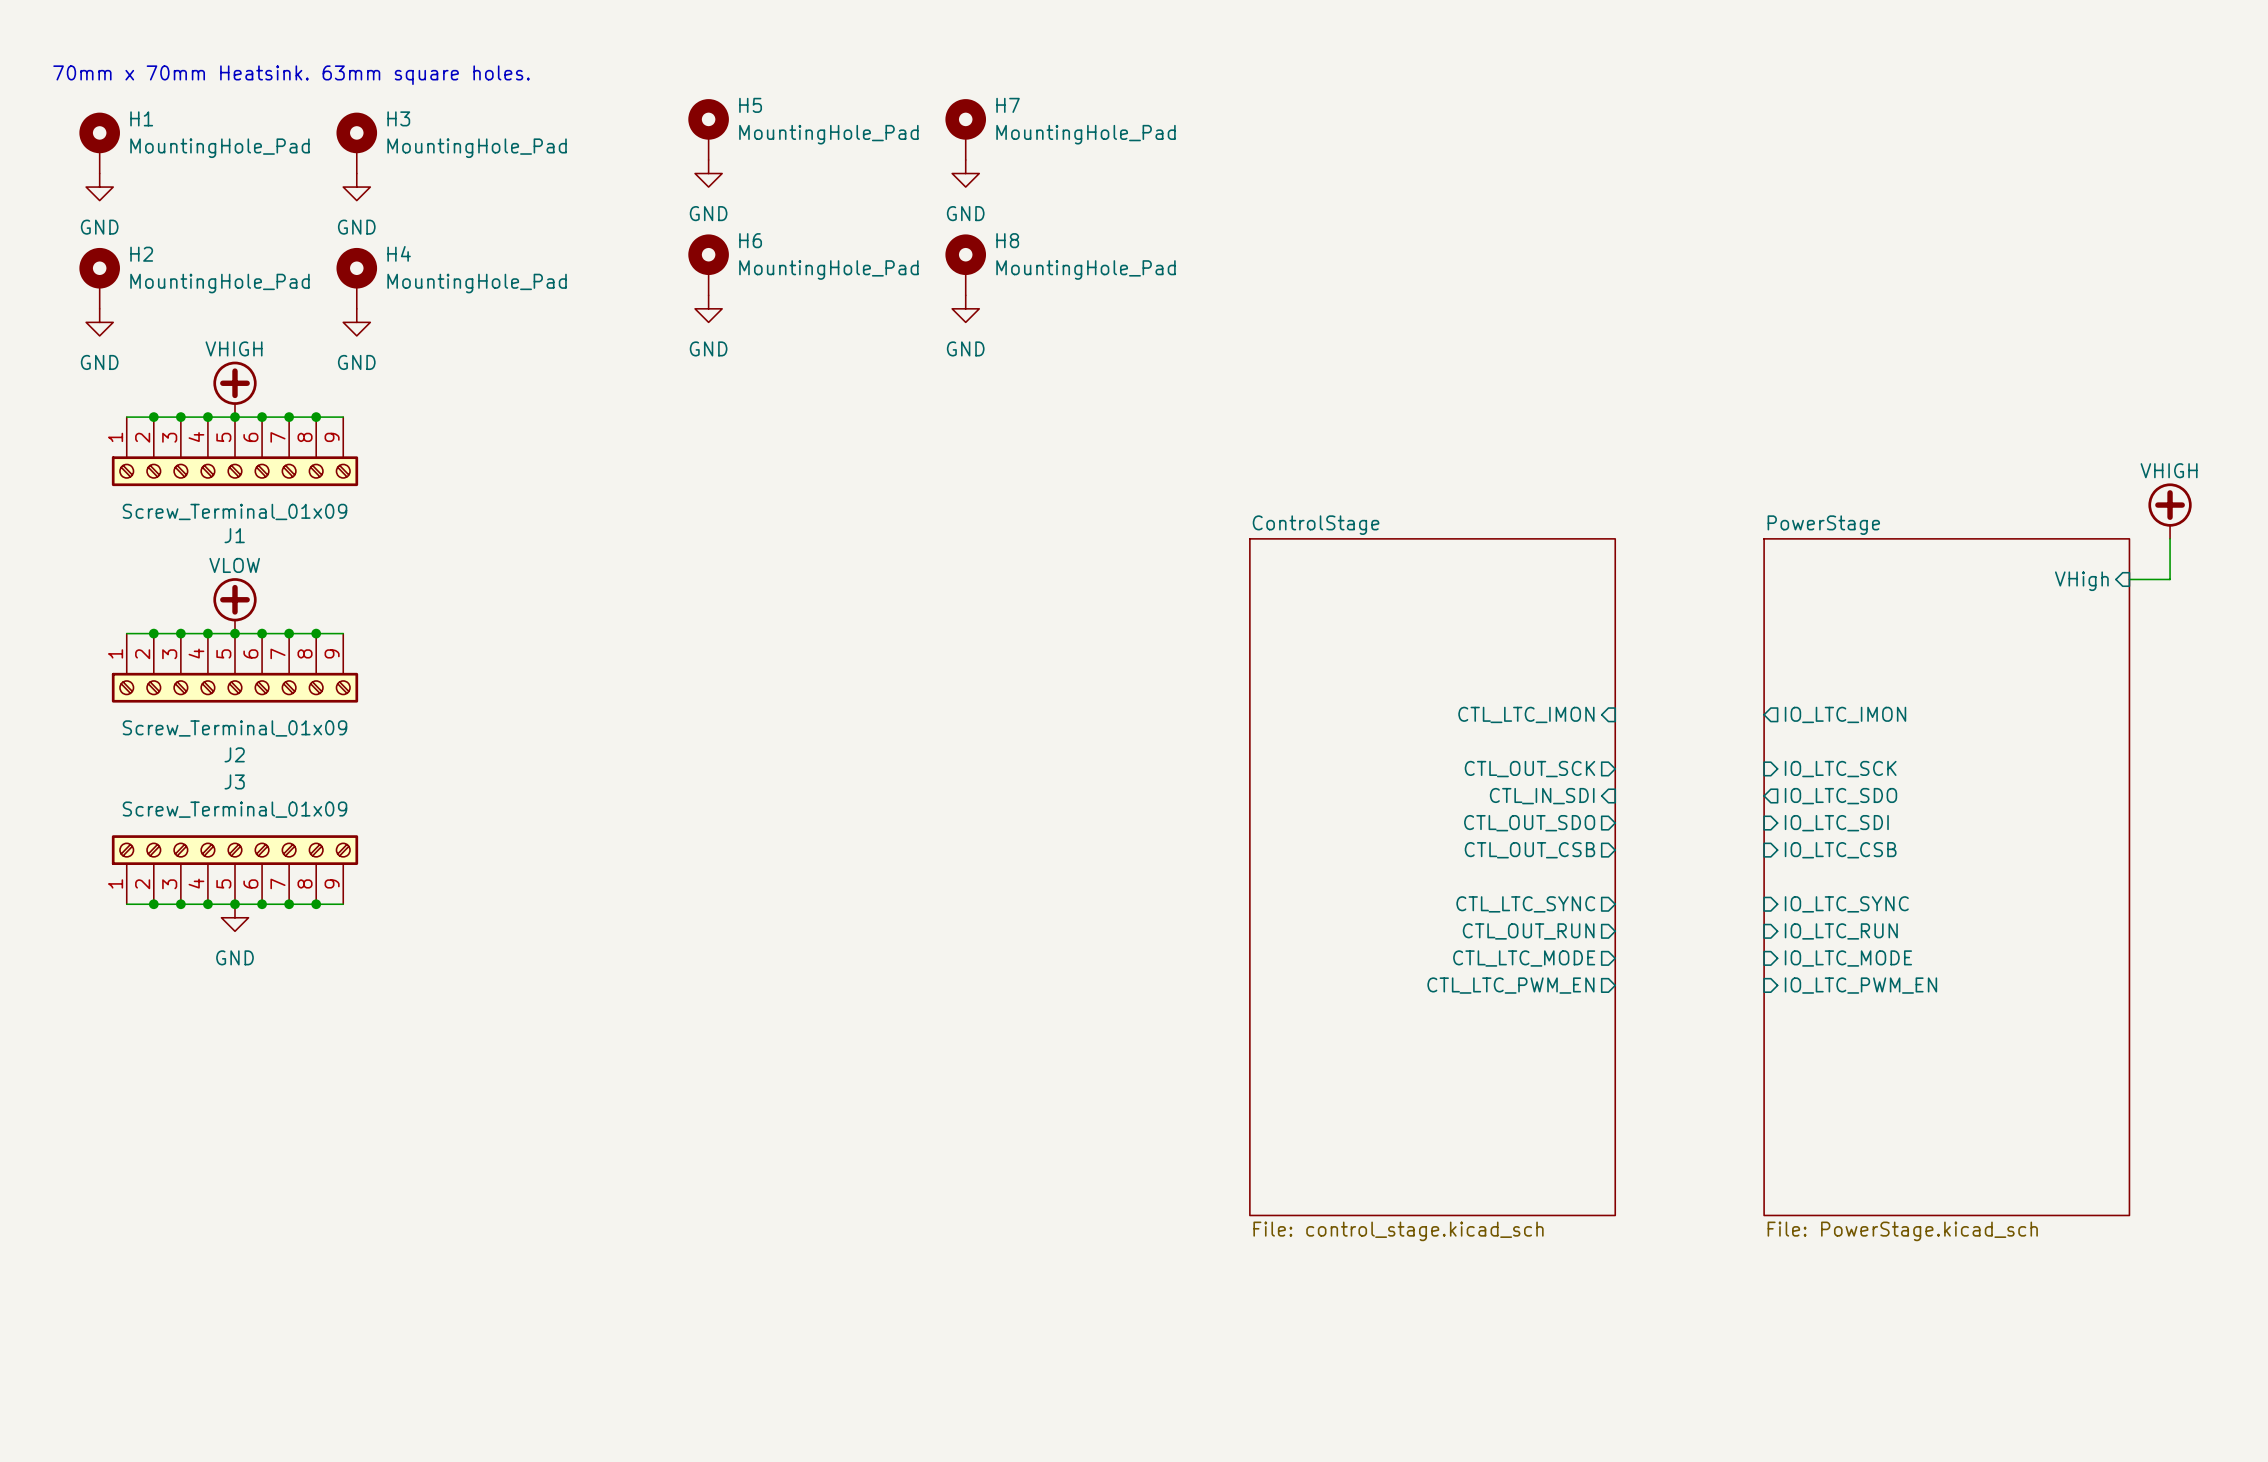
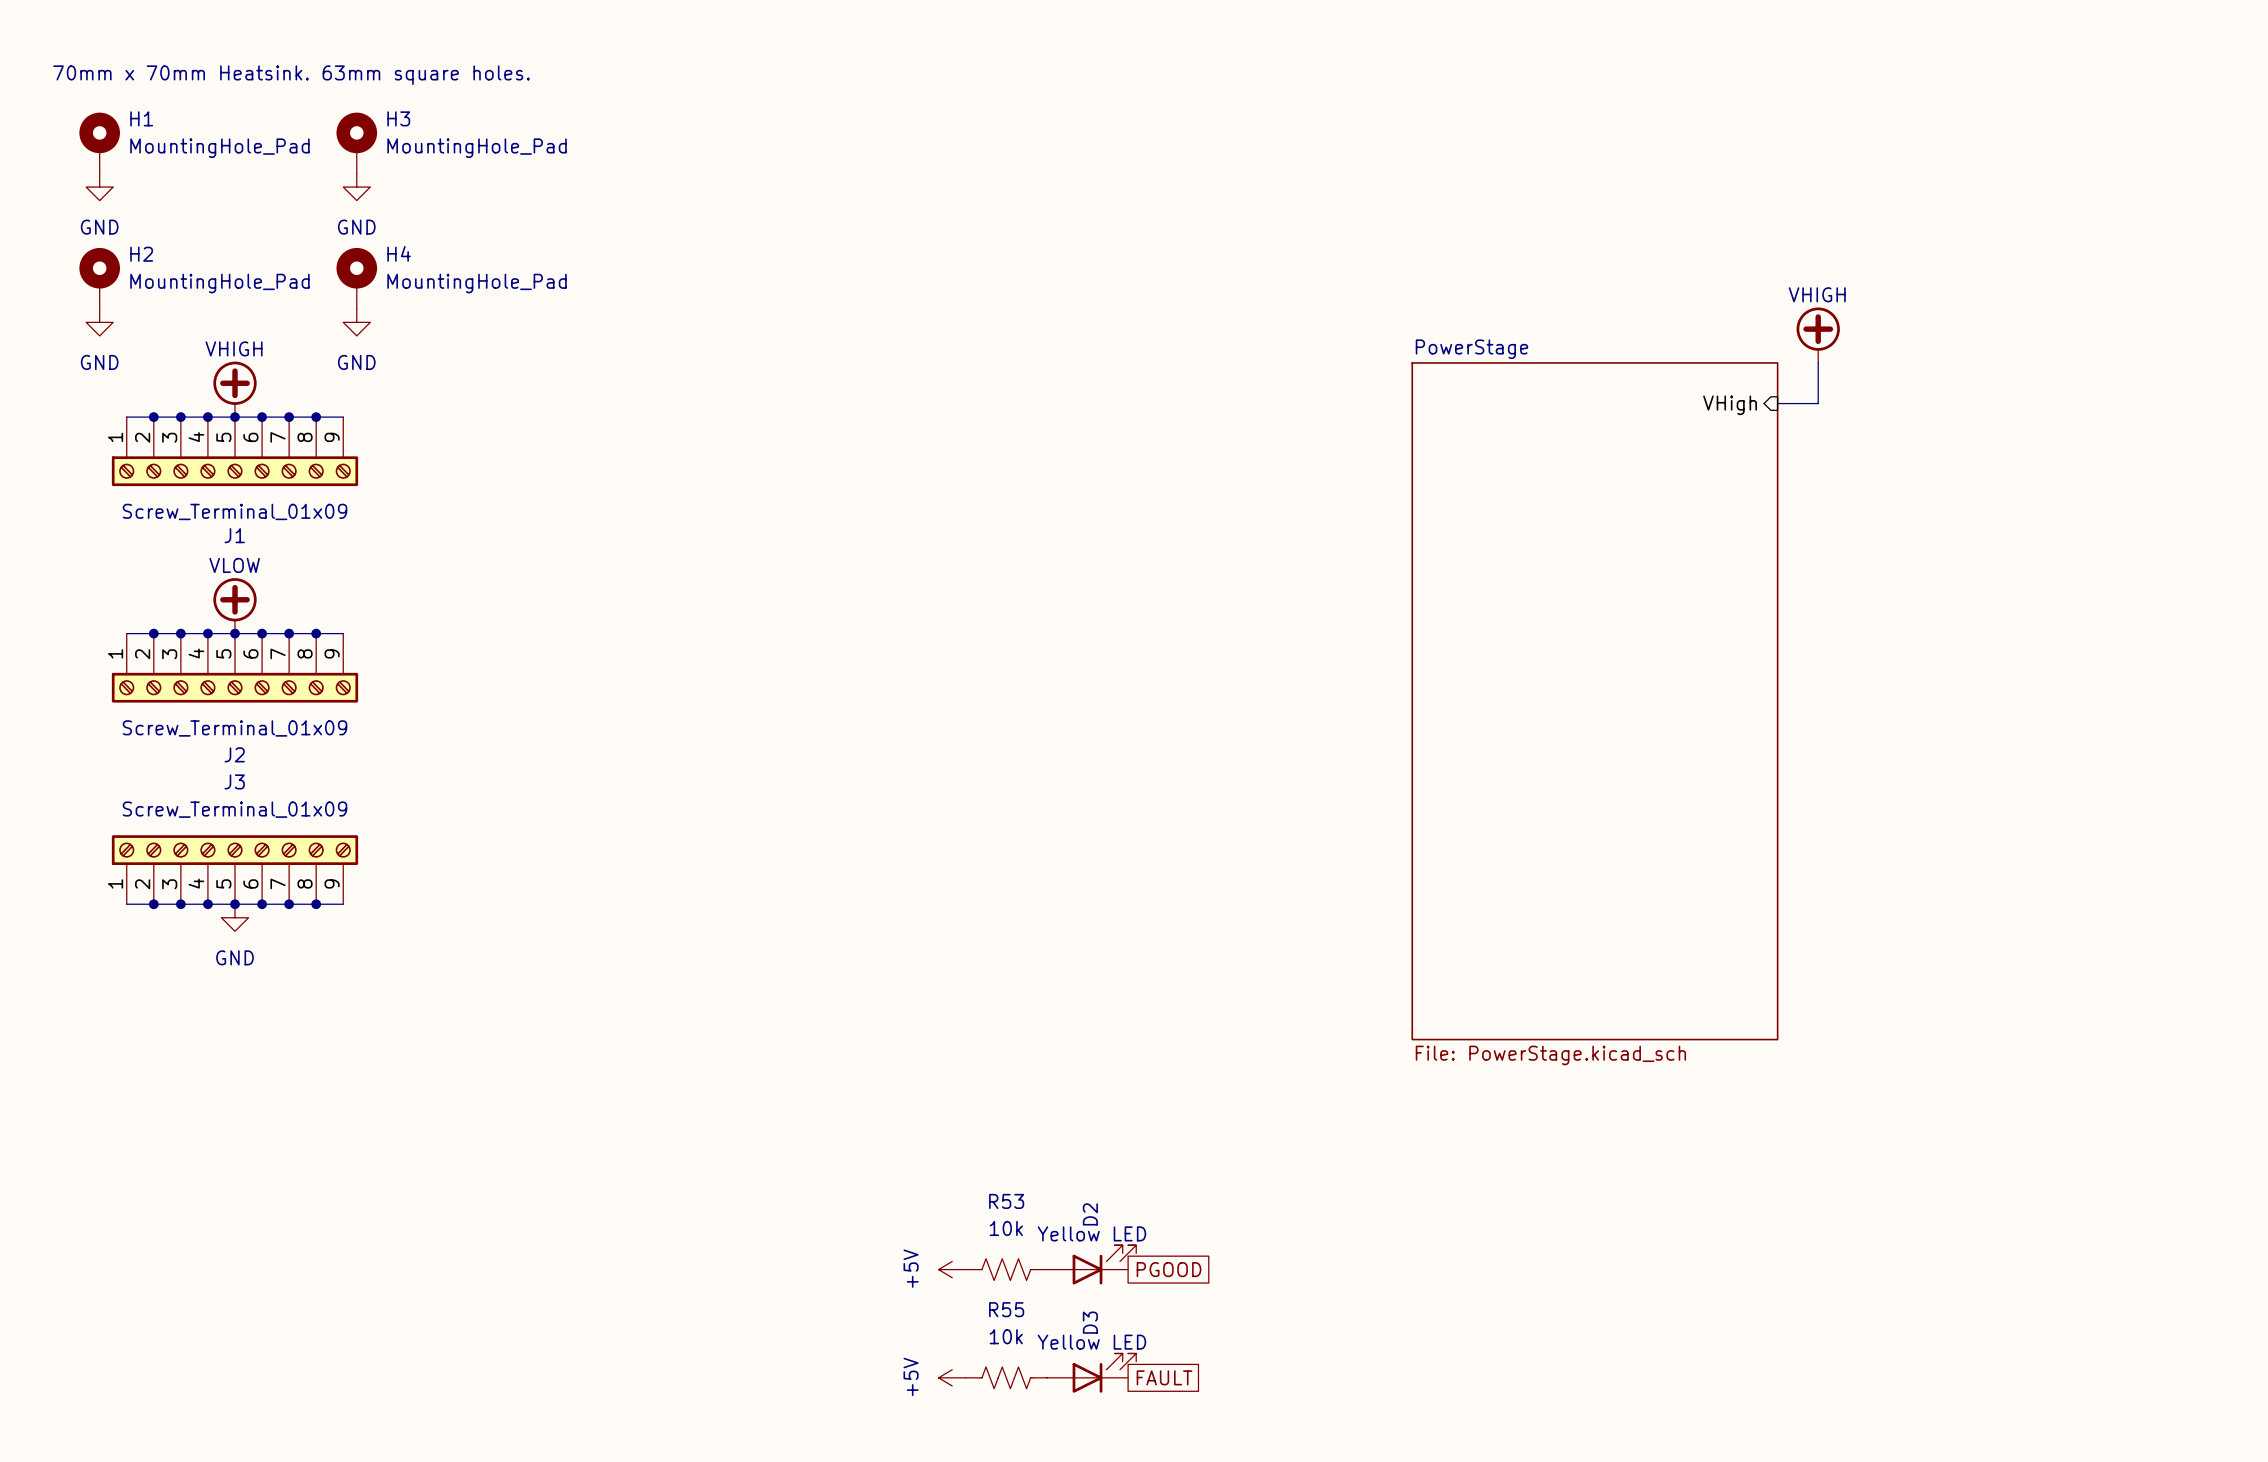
H5: MountingHole_Pad (708, 129) -> none
H7: MountingHole_Pad (965, 129) -> none
power symbol: GND (708, 173) -> none
power symbol: GND (965, 173) -> none
H6: MountingHole_Pad (708, 264) -> none
H8: MountingHole_Pad (965, 264) -> none
power symbol: GND (708, 308) -> none
power symbol: GND (965, 308) -> none
power symbol: none -> VHIGH (1818, 335)
wire: none -> (1818, 362) (1818, 403) (1777, 403)
sheet pin: none -> VHigh (1730, 405)
power symbol: VHIGH (2170, 511) -> none
wire: (2170, 538) (2170, 579) (2129, 579) -> none
sheet pin: VHigh (2081, 581) -> none
sheet PowerStage: none -> File: PowerStage.kicad_sch (1594, 701)
sheet pin: CTL_LTC_IMON (1526, 714) -> none
sheet pin: IO_LTC_IMON (1845, 714) -> none
sheet pin: CTL_OUT_SCK (1529, 769) -> none
sheet pin: IO_LTC_SCK (1840, 769) -> none
sheet pin: CTL_IN_SDI (1542, 796) -> none
sheet pin: IO_LTC_SDO (1840, 796) -> none
sheet pin: CTL_OUT_SDO (1529, 823) -> none
sheet pin: IO_LTC_SDI (1836, 823) -> none
sheet pin: CTL_OUT_CSB (1529, 850) -> none
sheet pin: IO_LTC_CSB (1840, 850) -> none
sheet ControlStage: File: control_stage.kicad_sch (1432, 877) -> none
sheet PowerStage: File: PowerStage.kicad_sch (1946, 877) -> none
sheet pin: CTL_LTC_SYNC (1525, 904) -> none
sheet pin: IO_LTC_SYNC (1846, 904) -> none
sheet pin: CTL_OUT_RUN (1528, 931) -> none
sheet pin: IO_LTC_RUN (1841, 931) -> none
sheet pin: CTL_LTC_MODE (1524, 958) -> none
sheet pin: IO_LTC_MODE (1848, 958) -> none
sheet pin: CTL_LTC_PWM_EN (1510, 985) -> none
sheet pin: IO_LTC_PWM_EN (1860, 985) -> none
D2: none -> Yellow LED (1091, 1264)
power symbol: none -> +5V (952, 1269)
R53: none -> 10k (1006, 1269)
global label: none -> PGOOD (1169, 1269)
D3: none -> Yellow LED (1091, 1373)
power symbol: none -> +5V (952, 1377)
R55: none -> 10k (1006, 1377)
global label: none -> FAULT (1164, 1377)

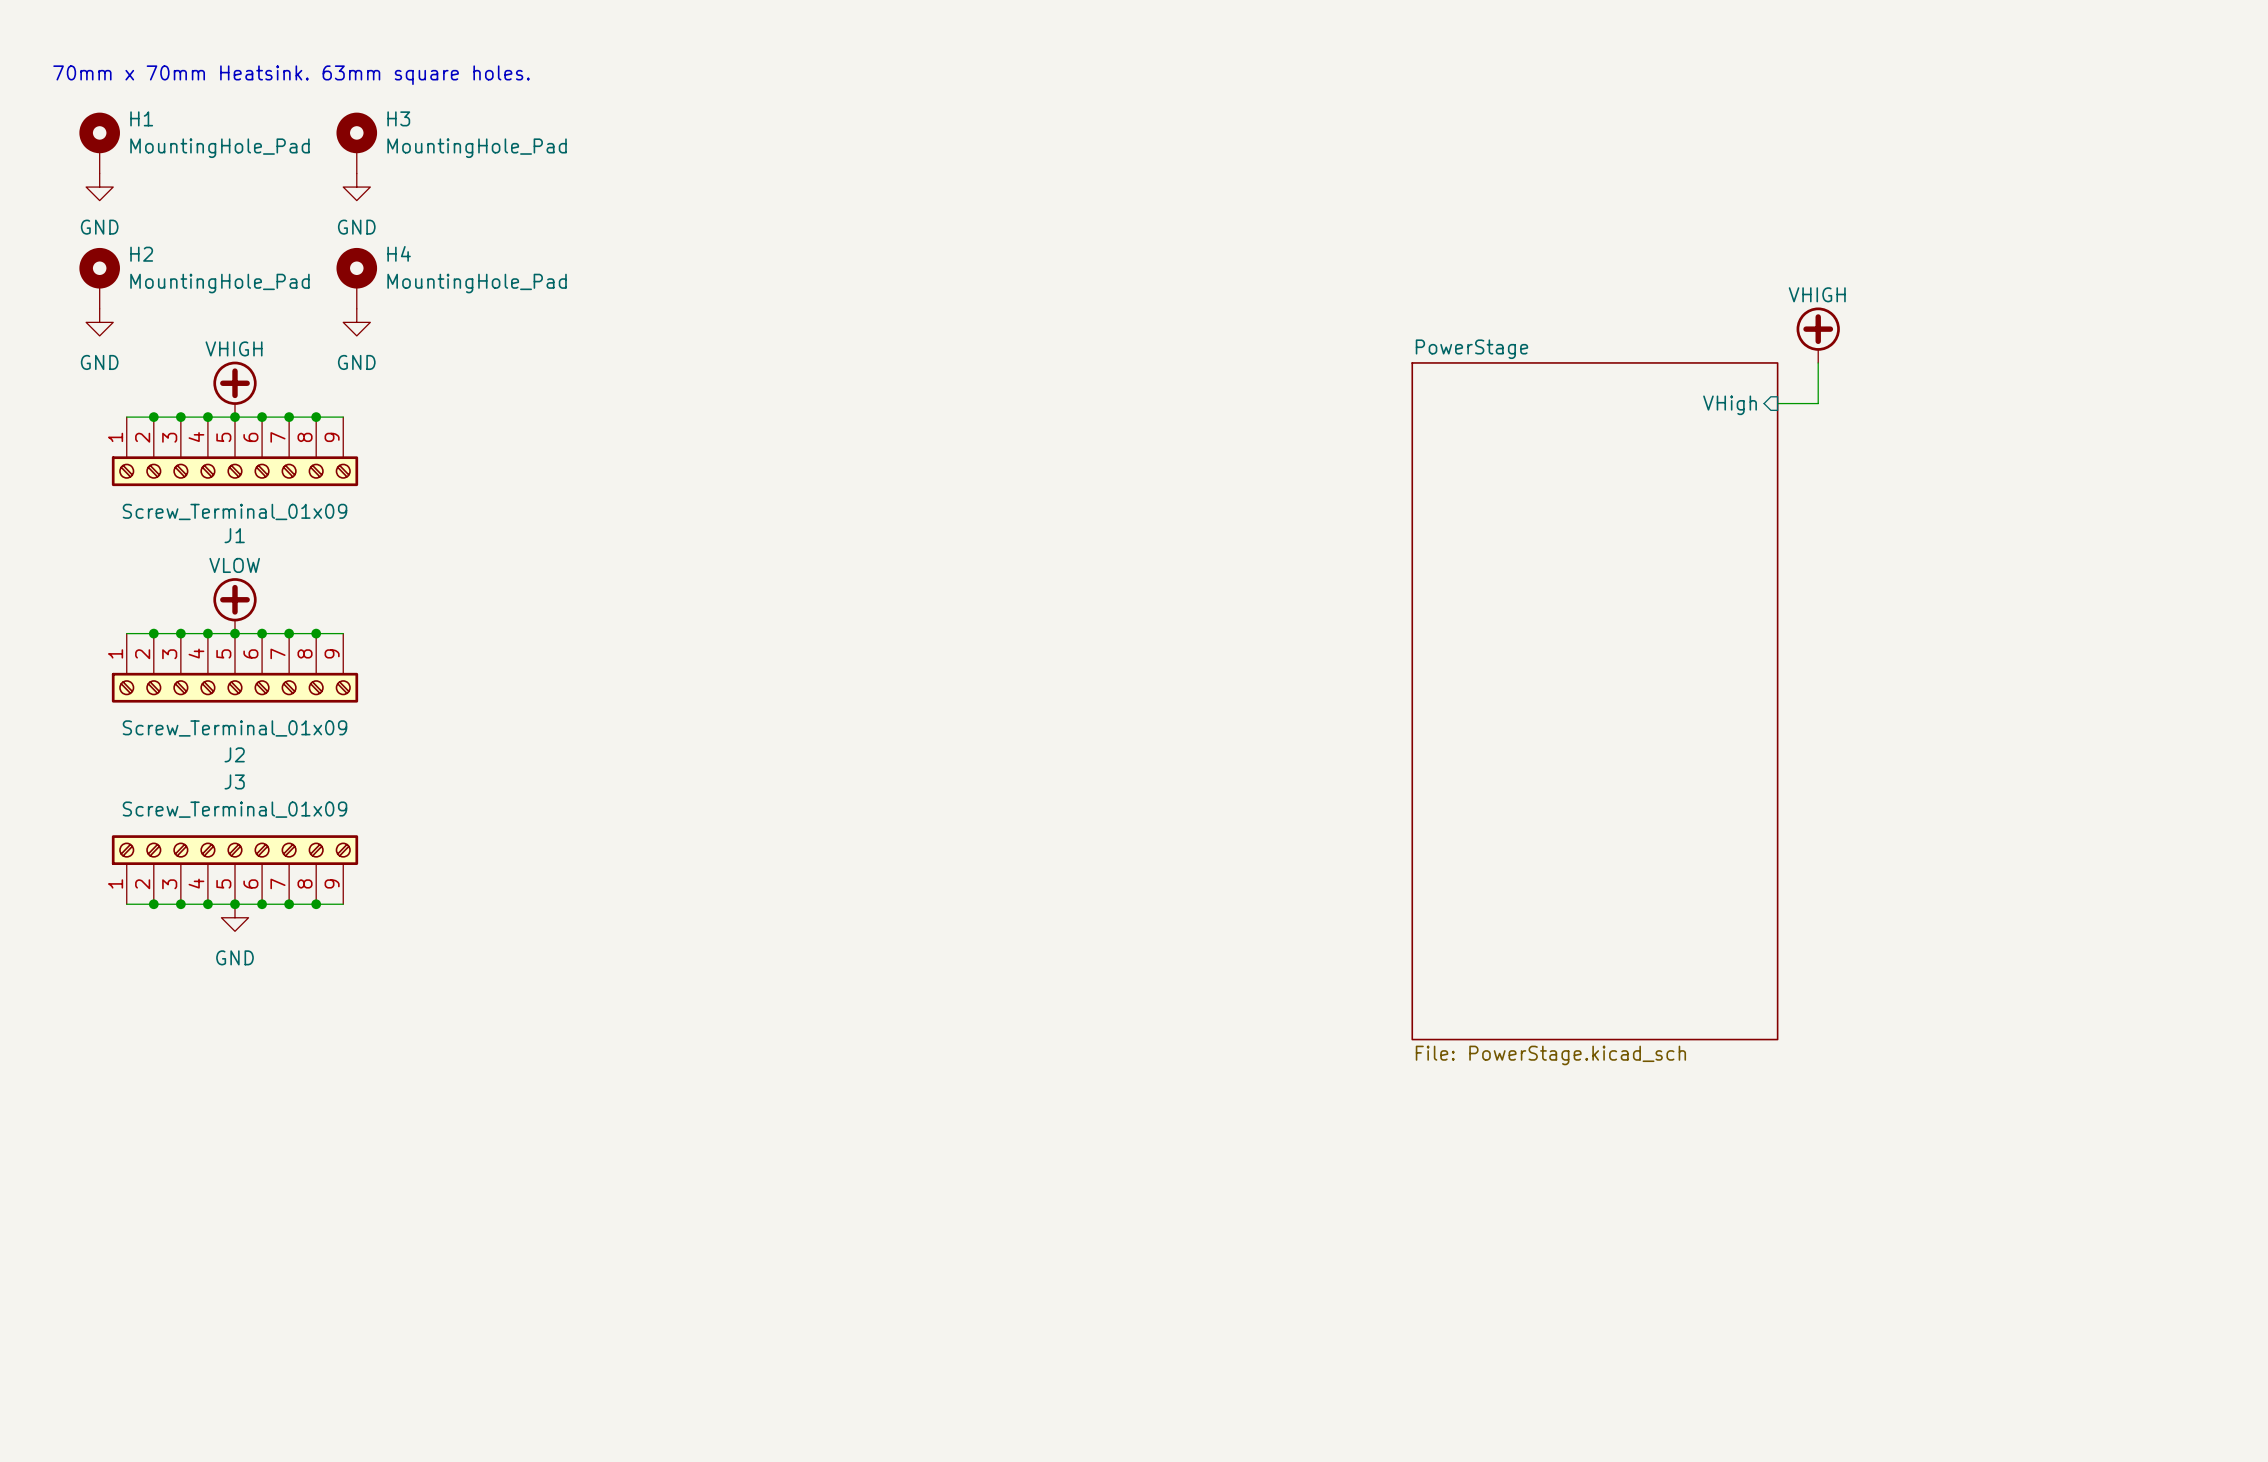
D2: Yellow LED (1091, 1264) -> none
power symbol: +5V (952, 1269) -> none
R53: 10k (1006, 1269) -> none
global label: PGOOD (1169, 1269) -> none
D3: Yellow LED (1091, 1373) -> none
power symbol: +5V (952, 1377) -> none
R55: 10k (1006, 1377) -> none
global label: FAULT (1164, 1377) -> none

